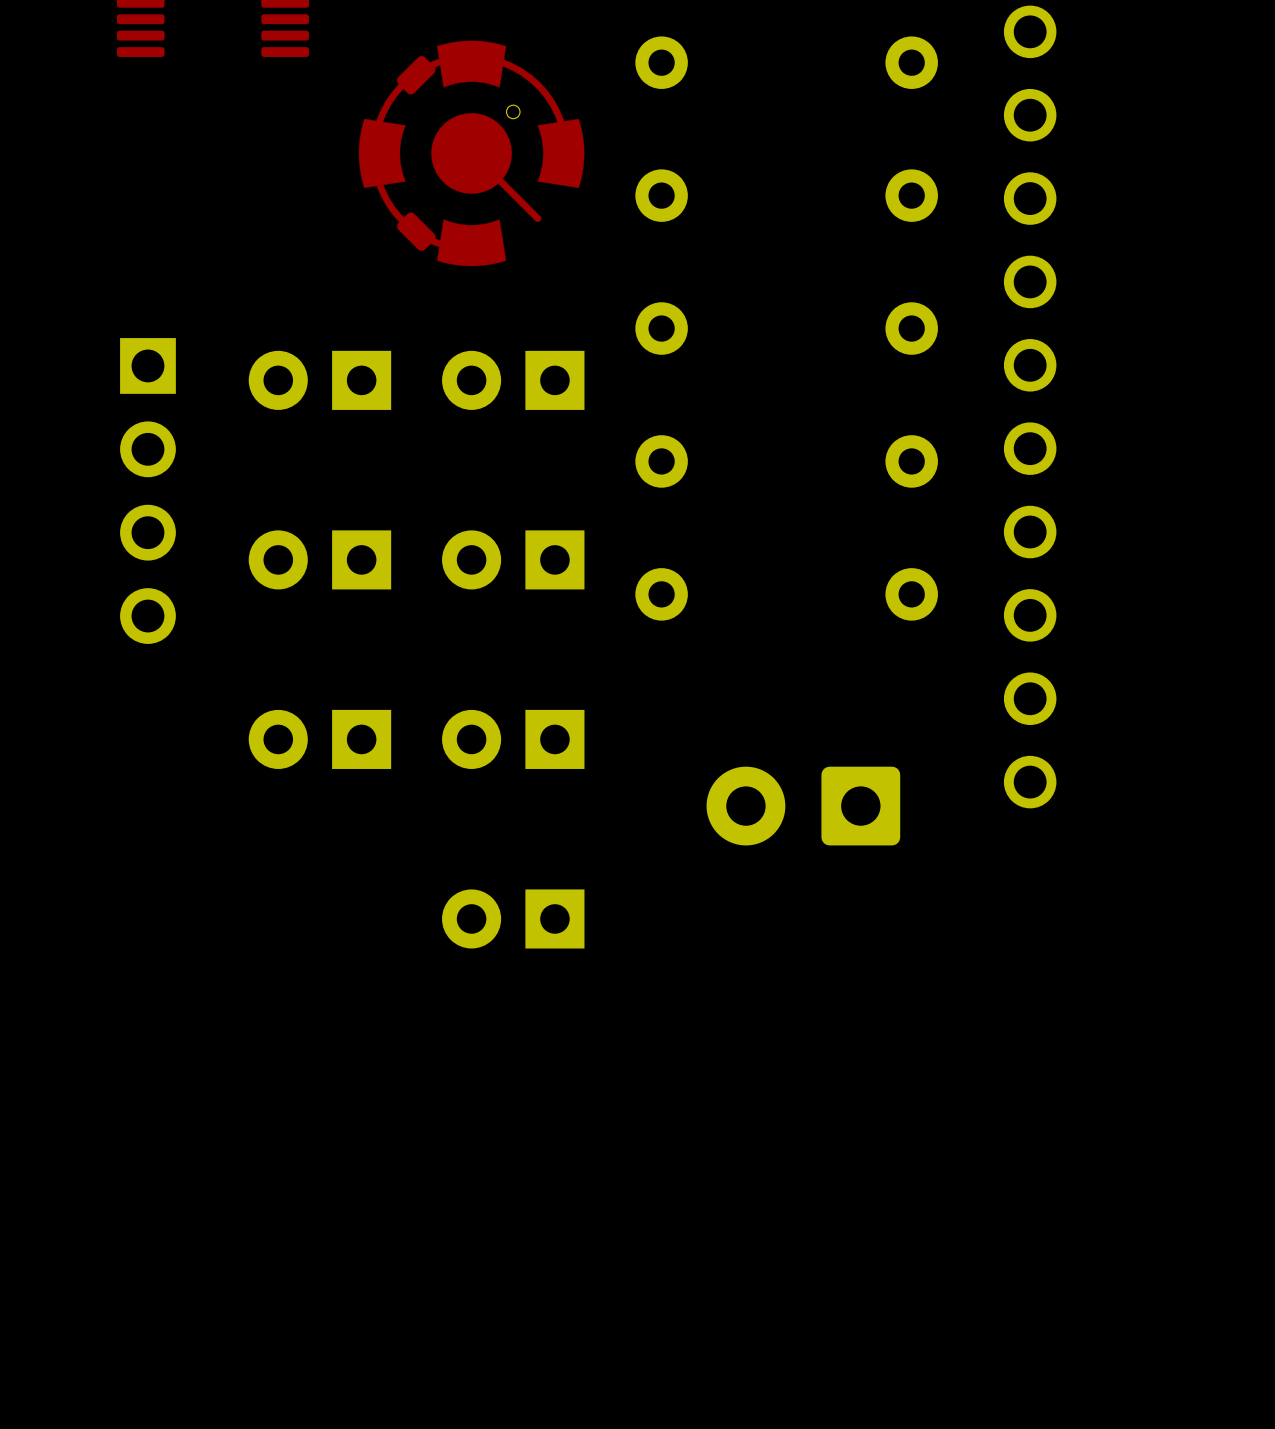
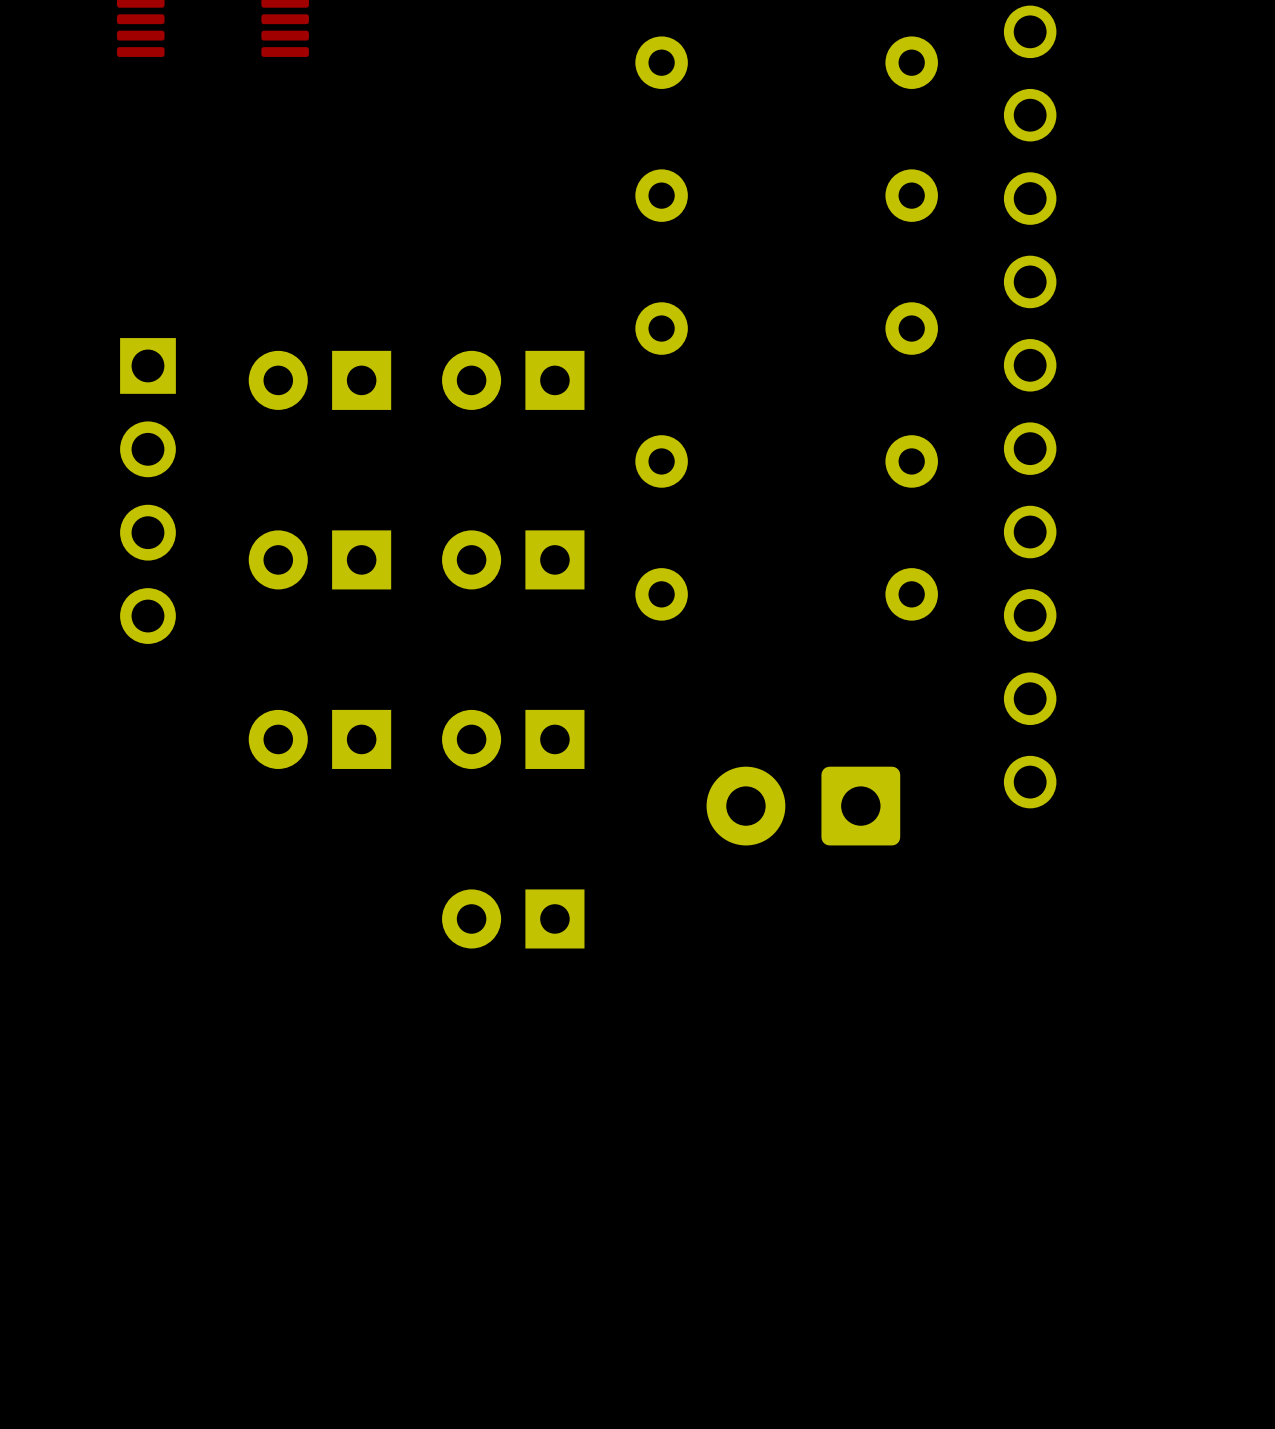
part: (471, 153) -> none

